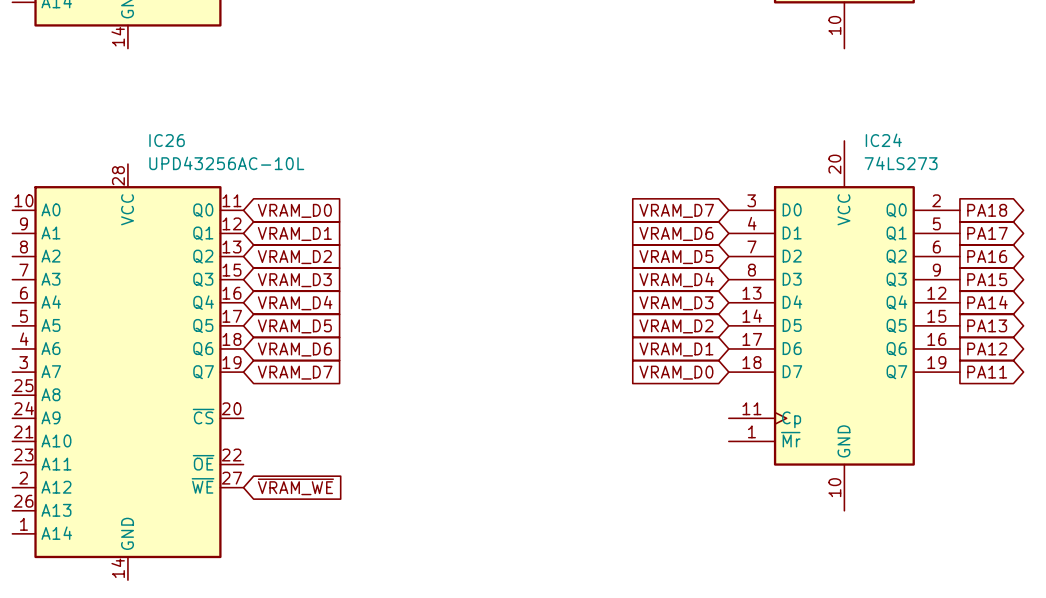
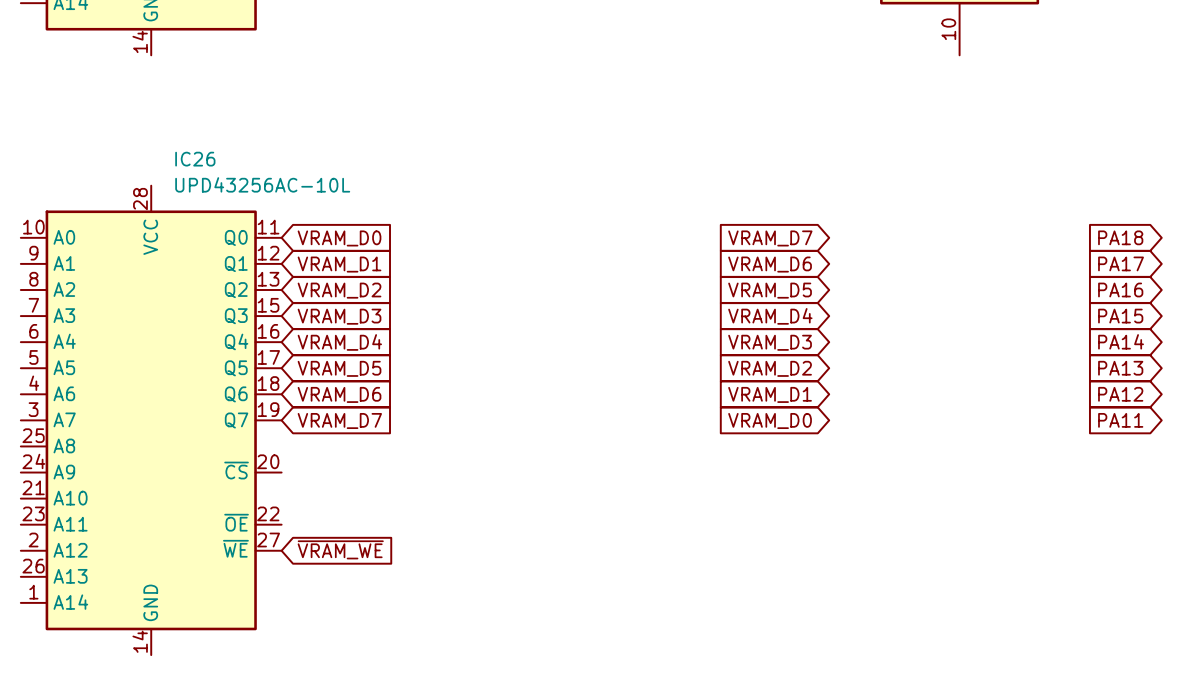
IC24: 74LS273 (844, 325) -> none

